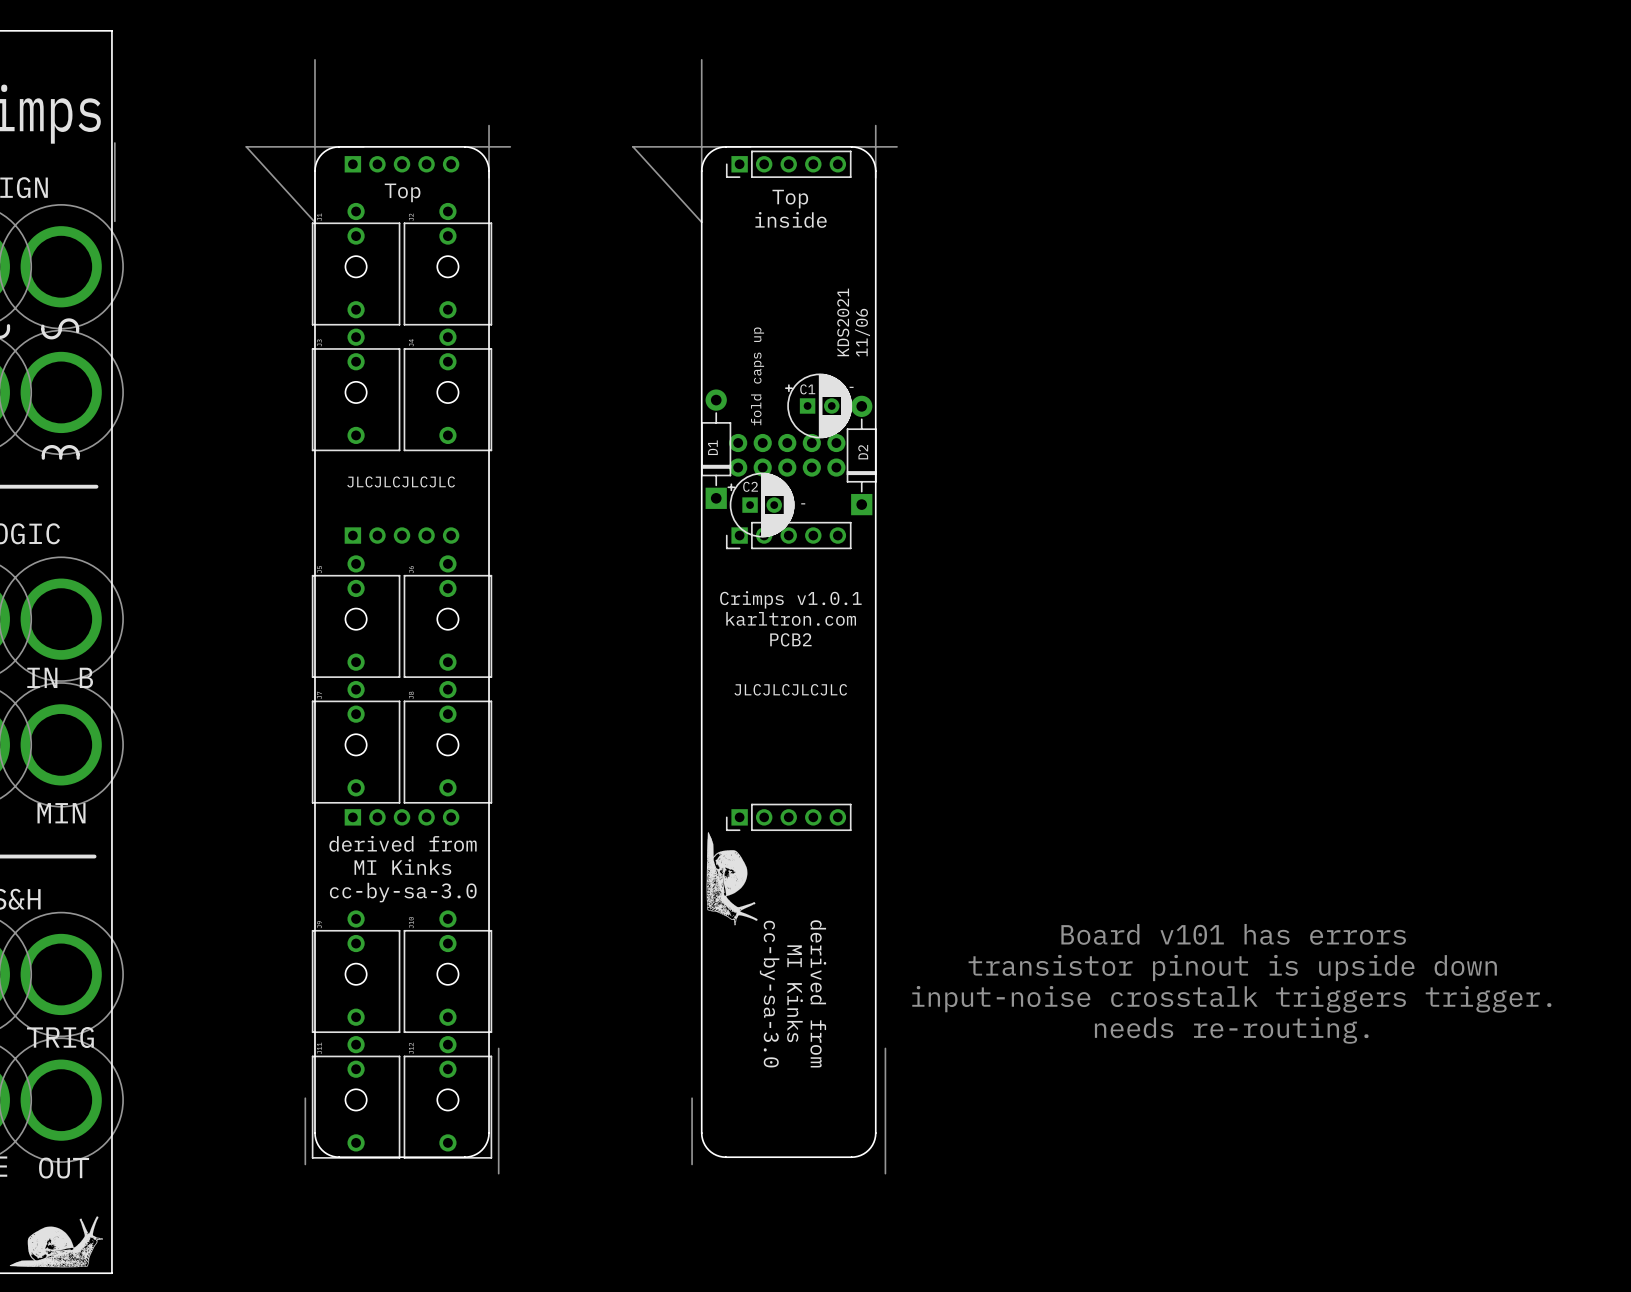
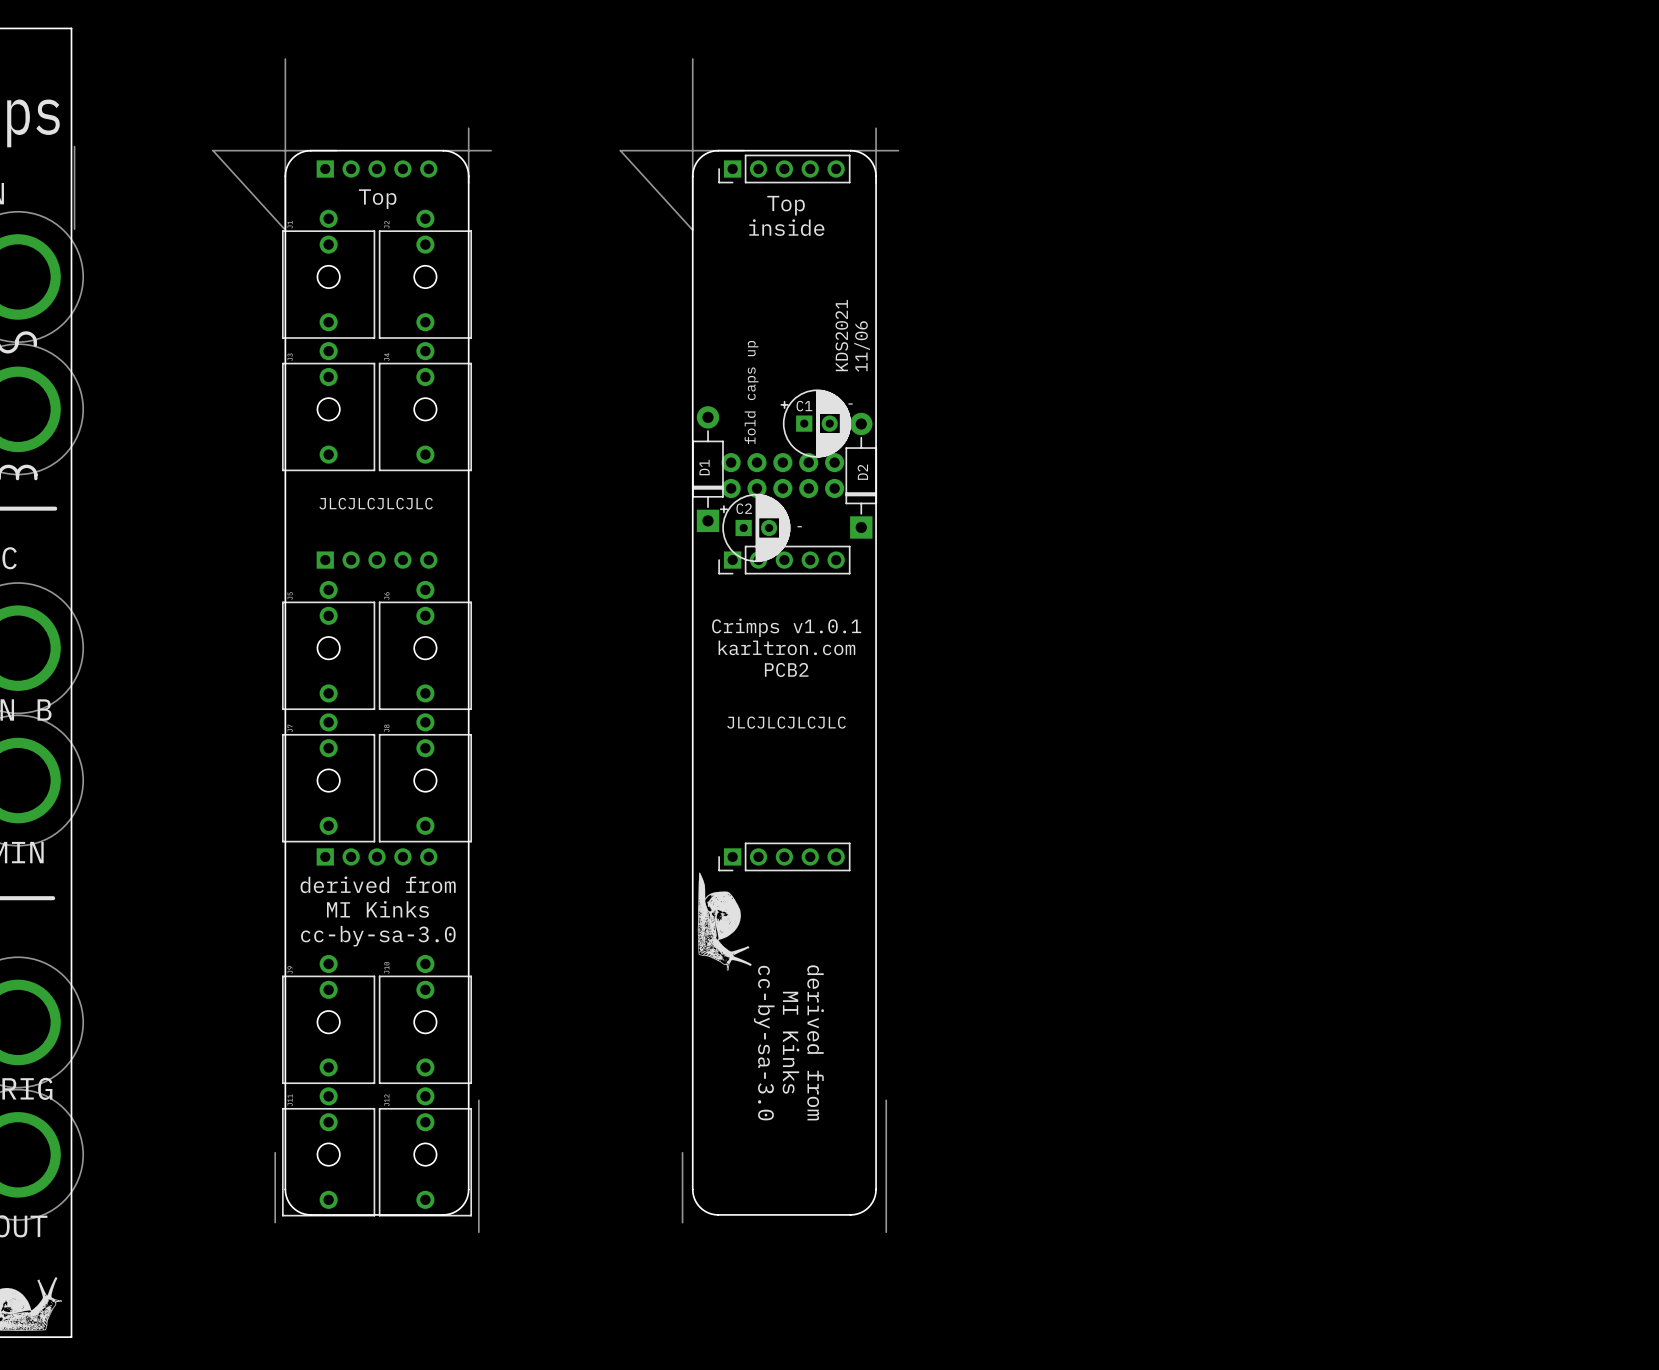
text: Board v101 has errors (1233, 934) -> none
text: transistor pinout is upside down (1232, 968) -> none
text: input-noise crosstalk triggers trigger. (1231, 999) -> none
text: needs re-routing. (1231, 1030) -> none

